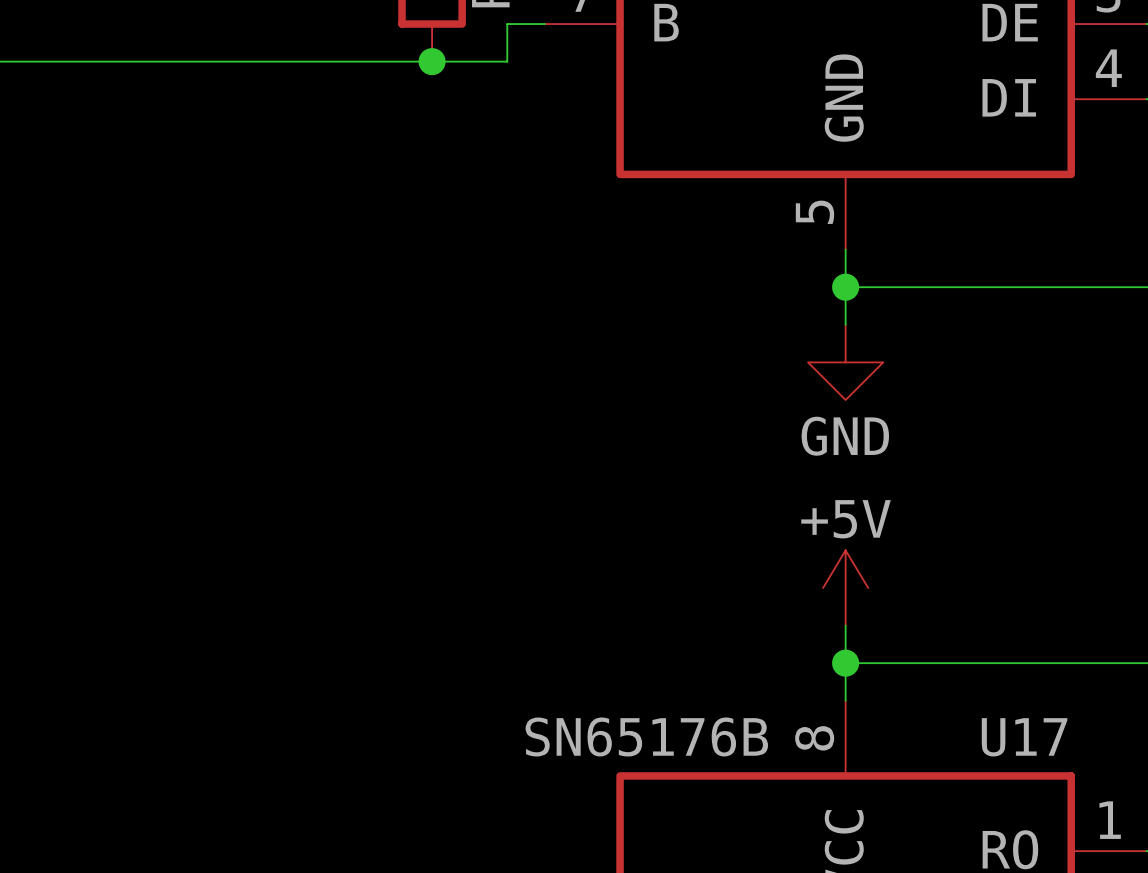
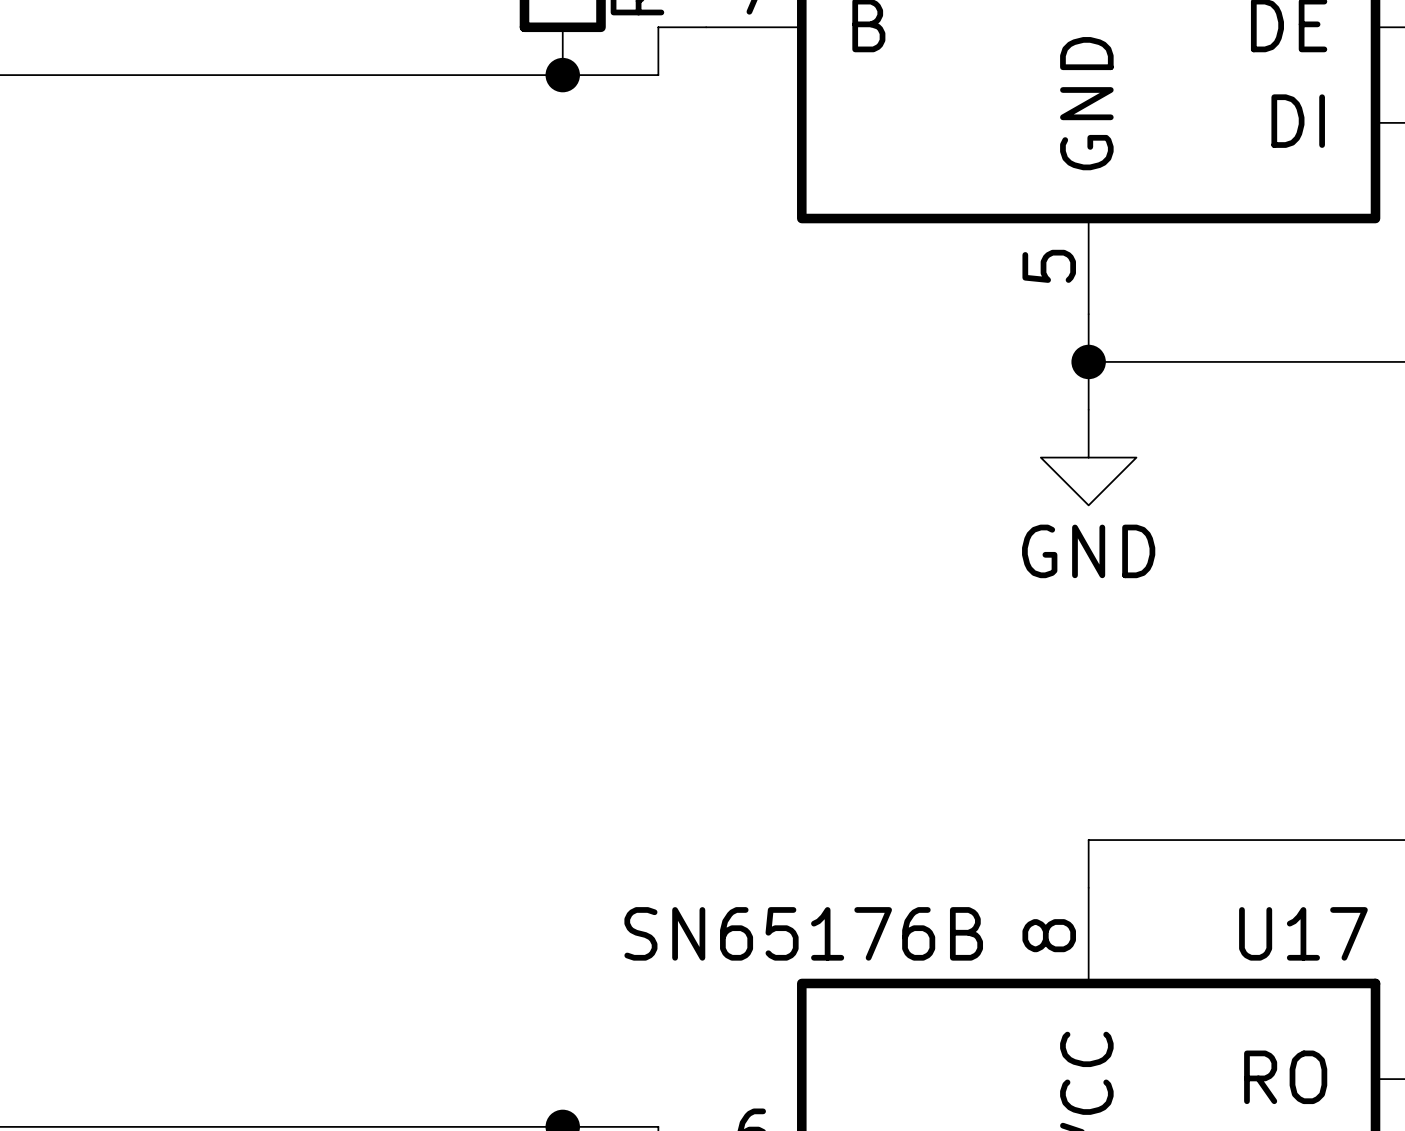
power symbol: +5V (845, 587) -> none
wire: (845, 625) (845, 663) -> none
junction: (845, 663) -> none

